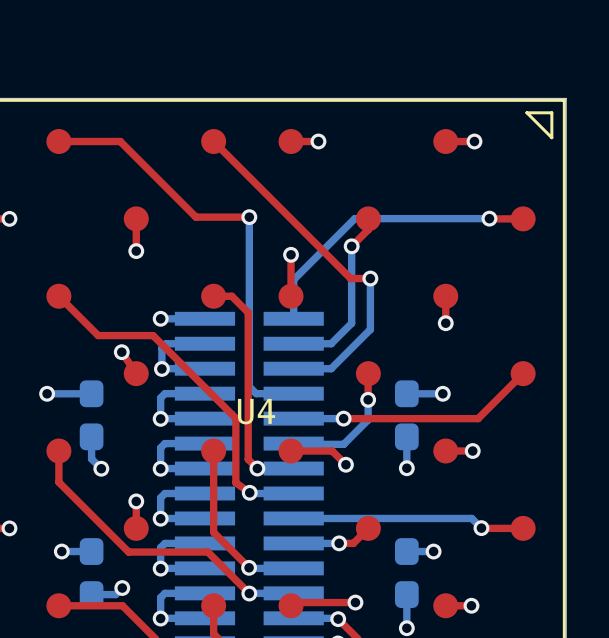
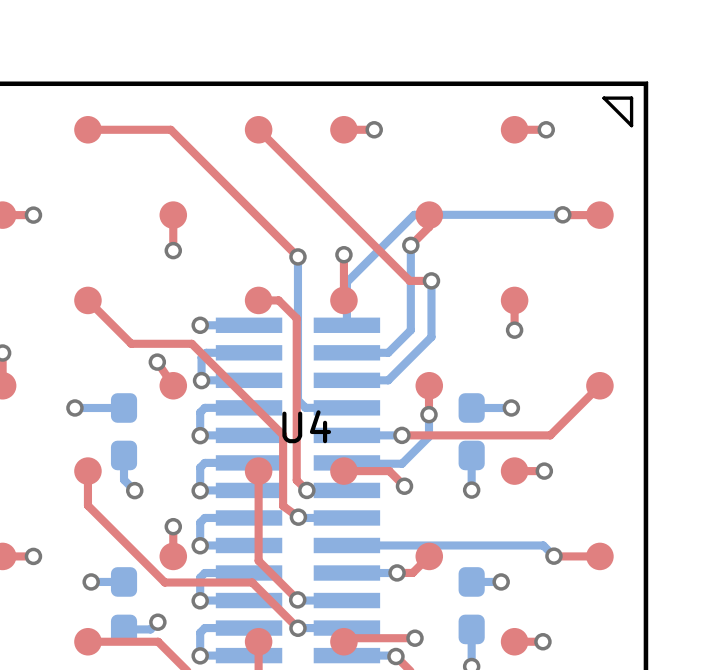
top track: (120, 141) (195, 217) (249, 217) -> (155, 129) (170, 129) (297, 256)
bottom track: (249, 217) (249, 256) -> none
via position: (249, 217) -> (297, 256)

